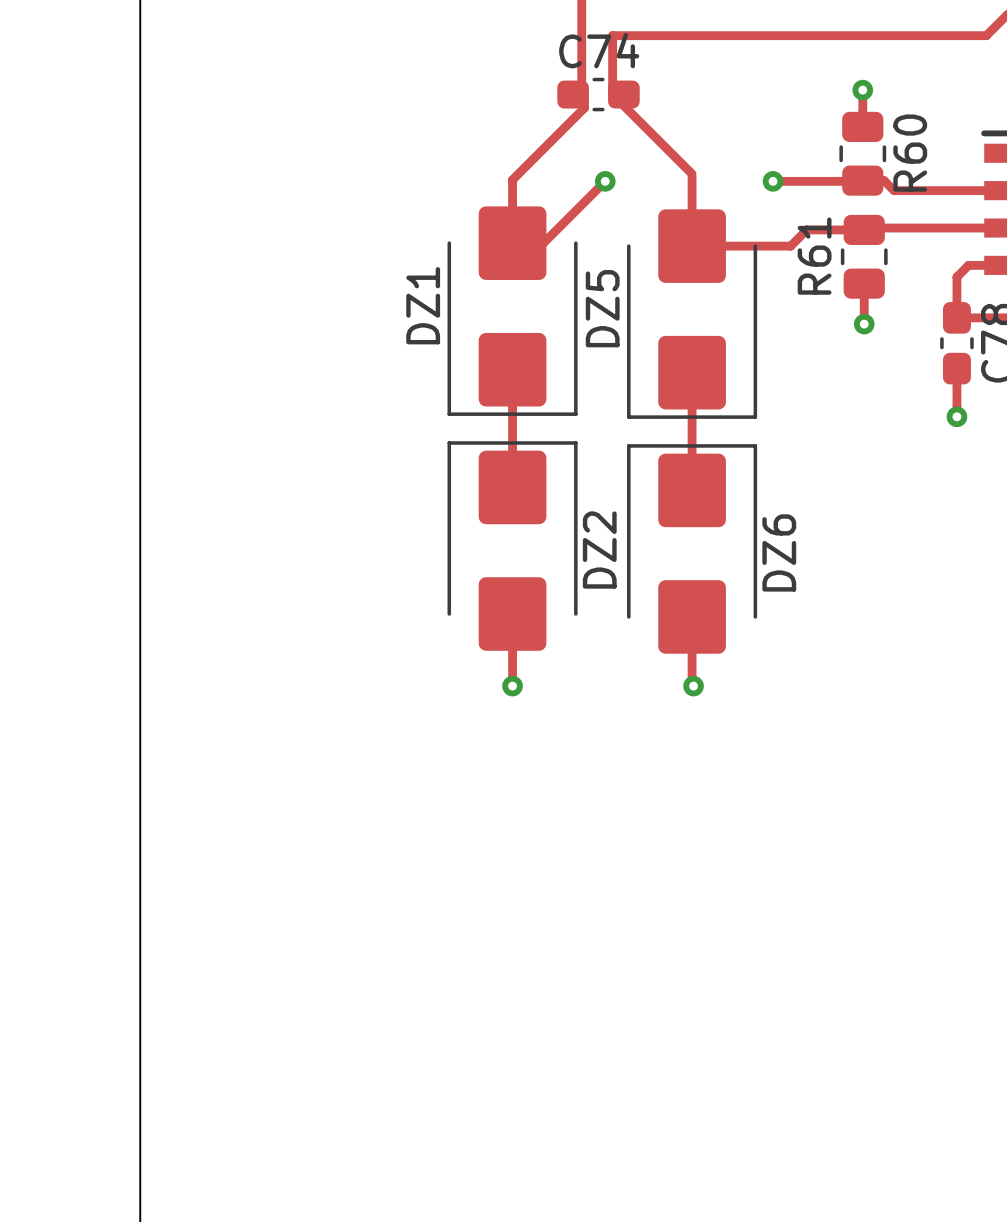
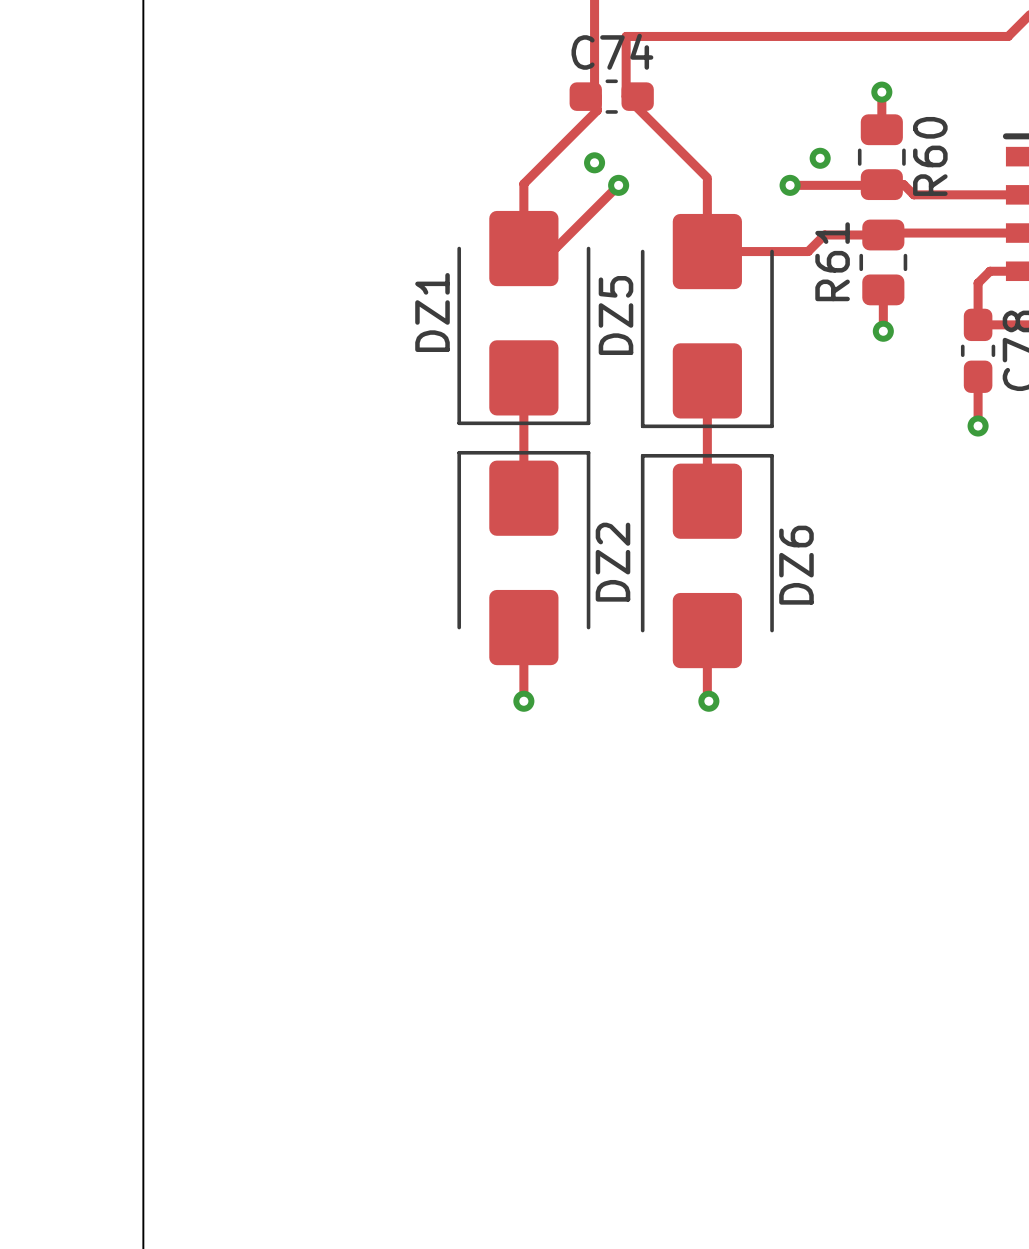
via: none -> (820, 158)
via: none -> (594, 162)

